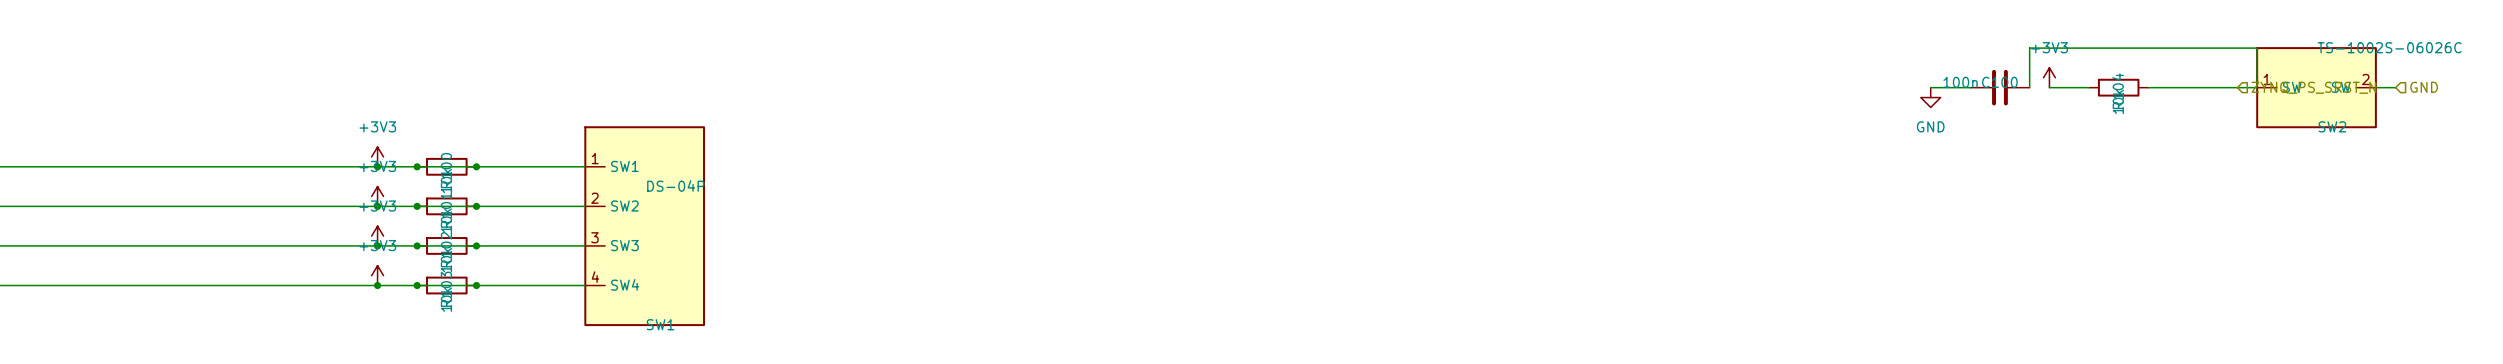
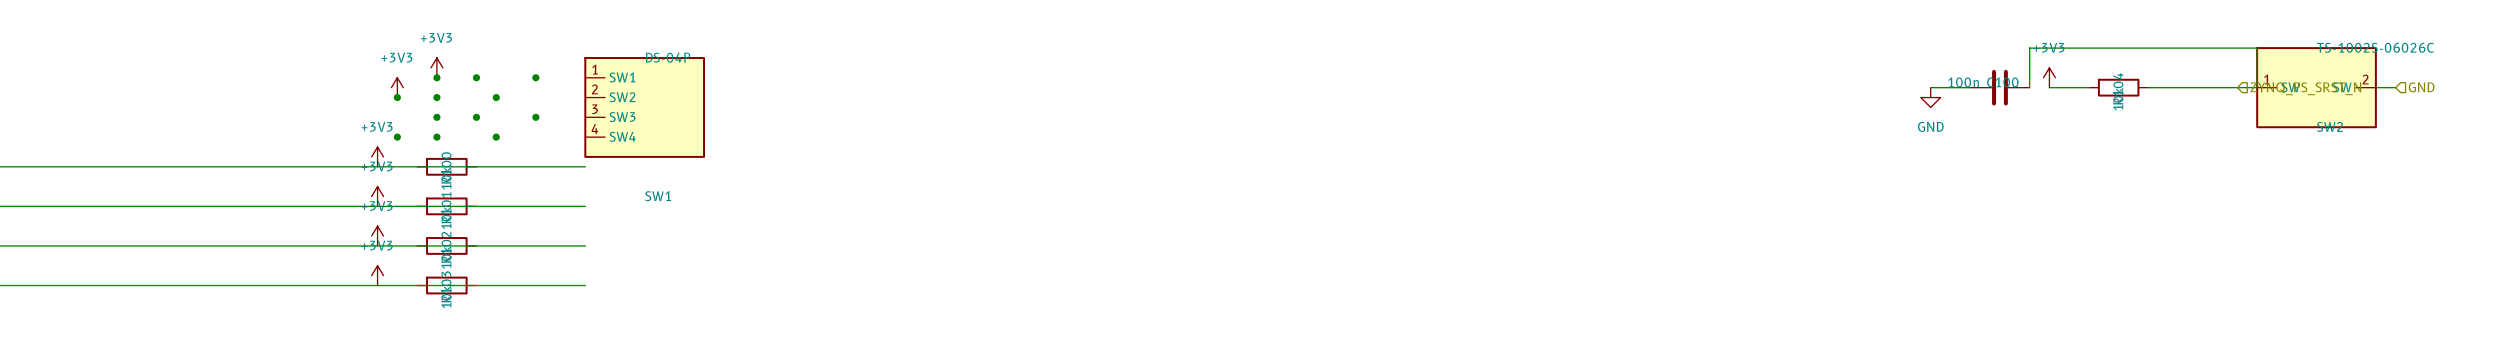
power symbol: none -> +3V3 (436, 67)
junction: none -> (436, 77)
junction: none -> (476, 77)
junction: none -> (535, 77)
power symbol: none -> +3V3 (397, 87)
junction: none -> (397, 97)
junction: none -> (436, 97)
junction: none -> (496, 97)
junction: none -> (436, 117)
junction: none -> (476, 117)
junction: none -> (535, 117)
SW1 symbol: [584, 126, 706, 327] -> [584, 57, 706, 158]
junction: none -> (397, 137)
junction: none -> (436, 137)
junction: none -> (496, 137)
junction: (377, 166) -> none
junction: (417, 166) -> none
junction: (476, 166) -> none
junction: (377, 206) -> none
junction: (417, 206) -> none
junction: (476, 206) -> none
junction: (377, 245) -> none
junction: (417, 245) -> none
junction: (476, 245) -> none
junction: (377, 285) -> none
junction: (417, 285) -> none
junction: (476, 285) -> none

